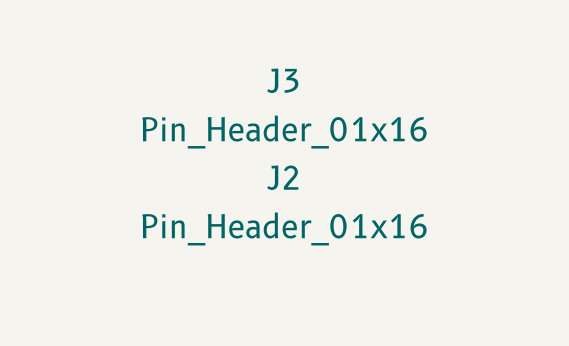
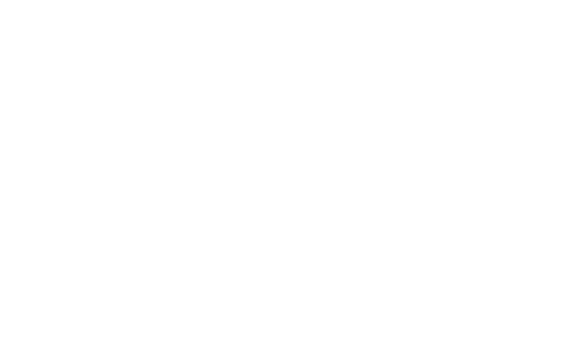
J3: Pin_Header_01x16 (284, 108) -> none
J2: Pin_Header_01x16 (284, 205) -> none

